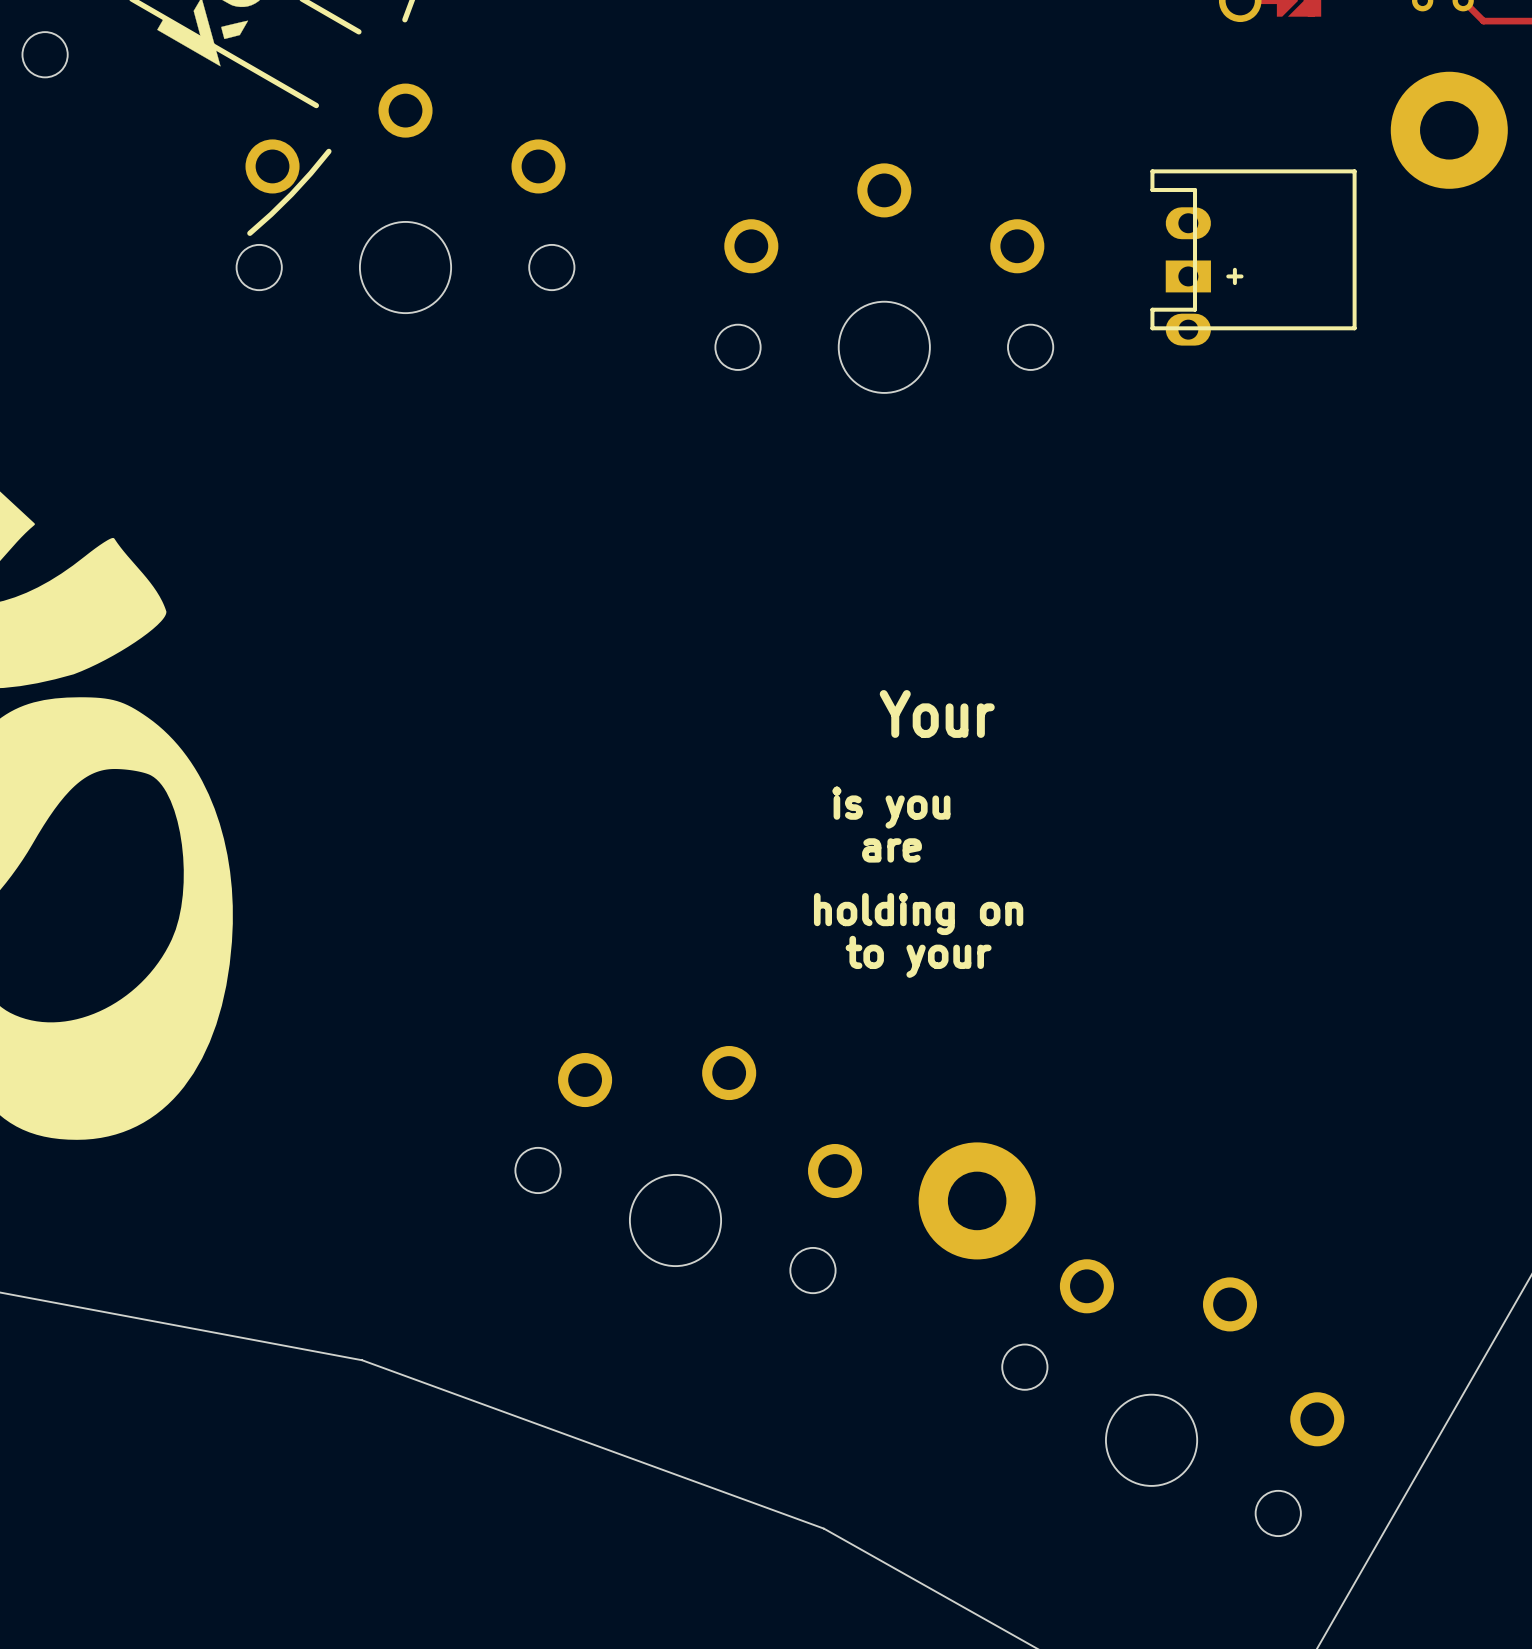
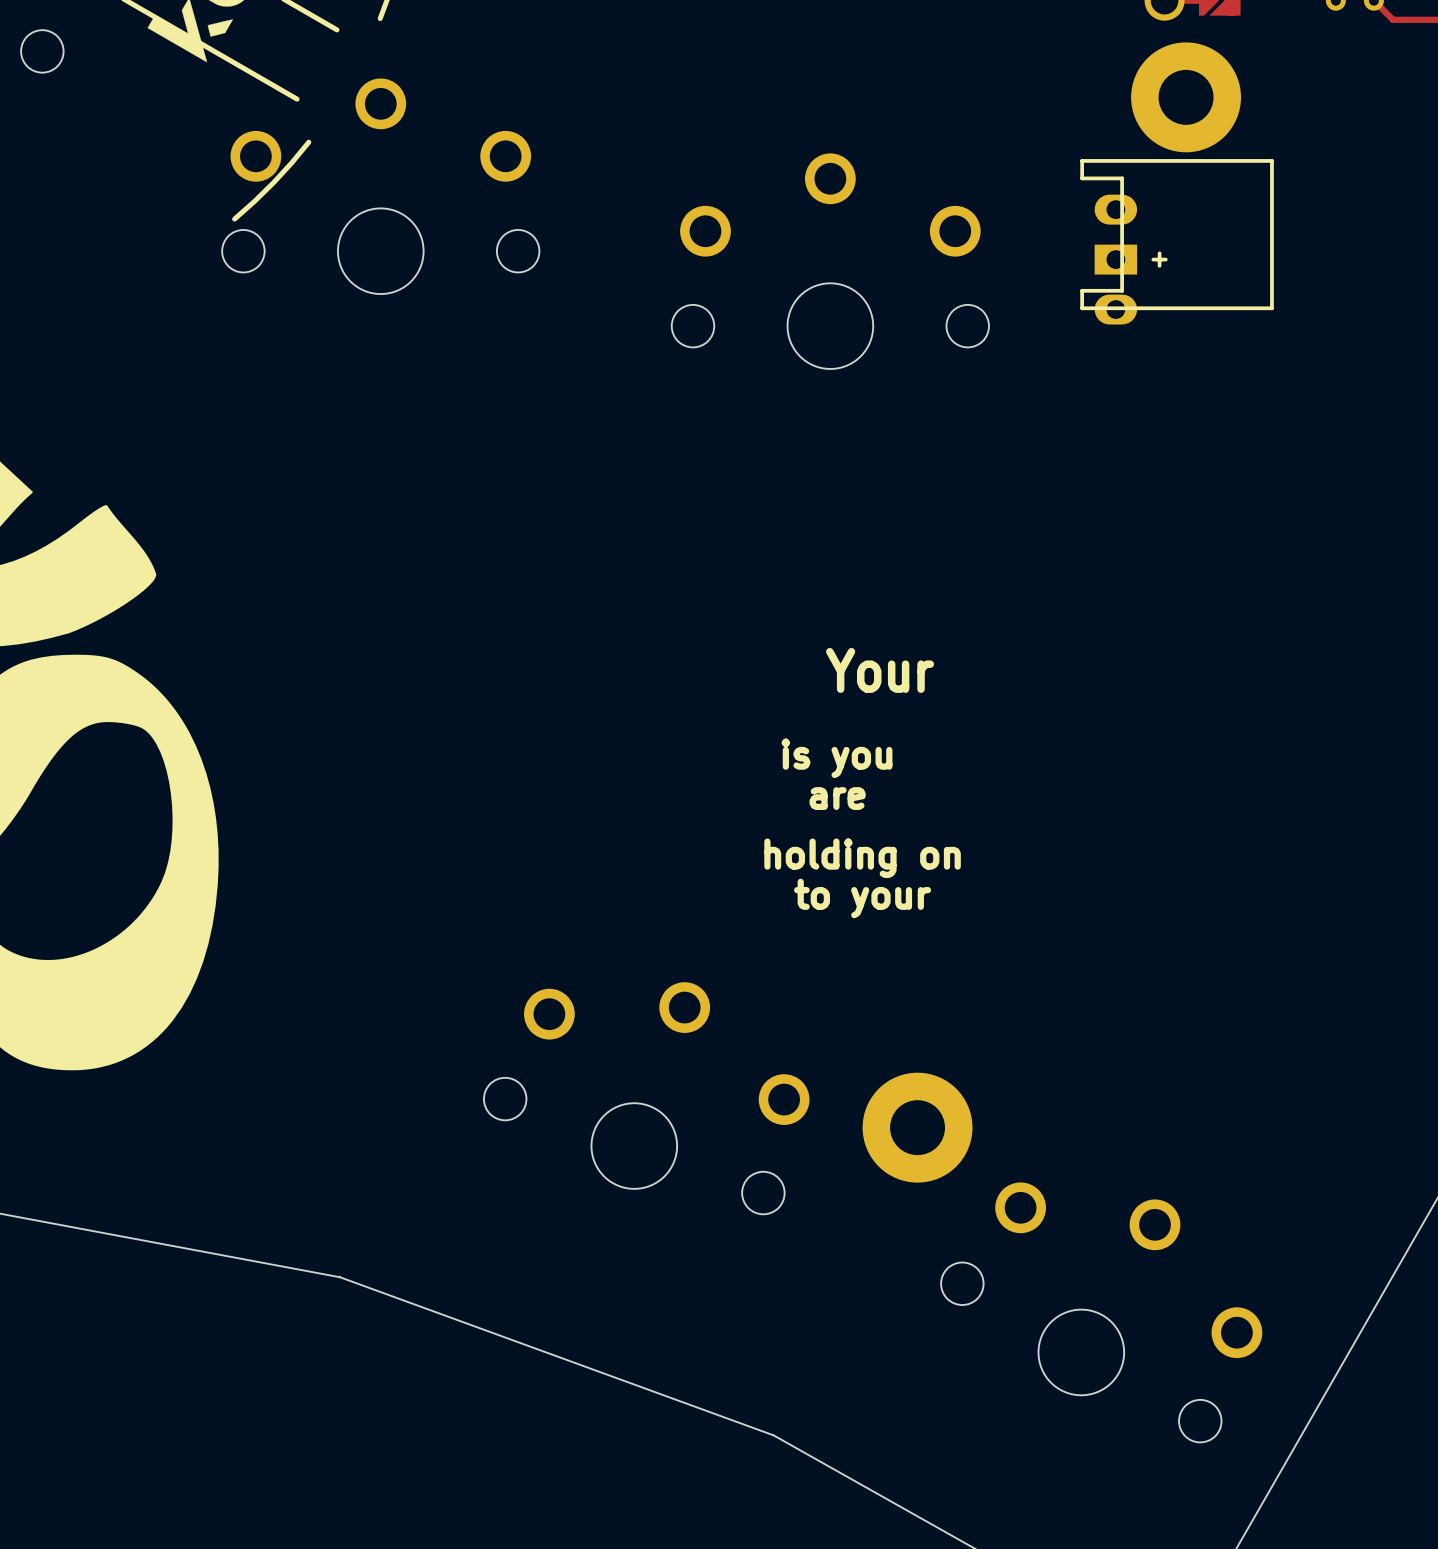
part: none -> (1186, 97)
part: (1449, 130) -> none

